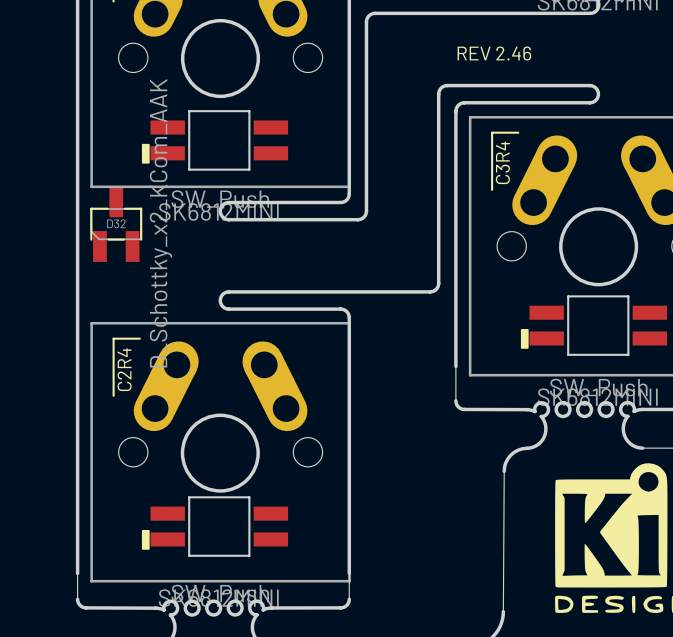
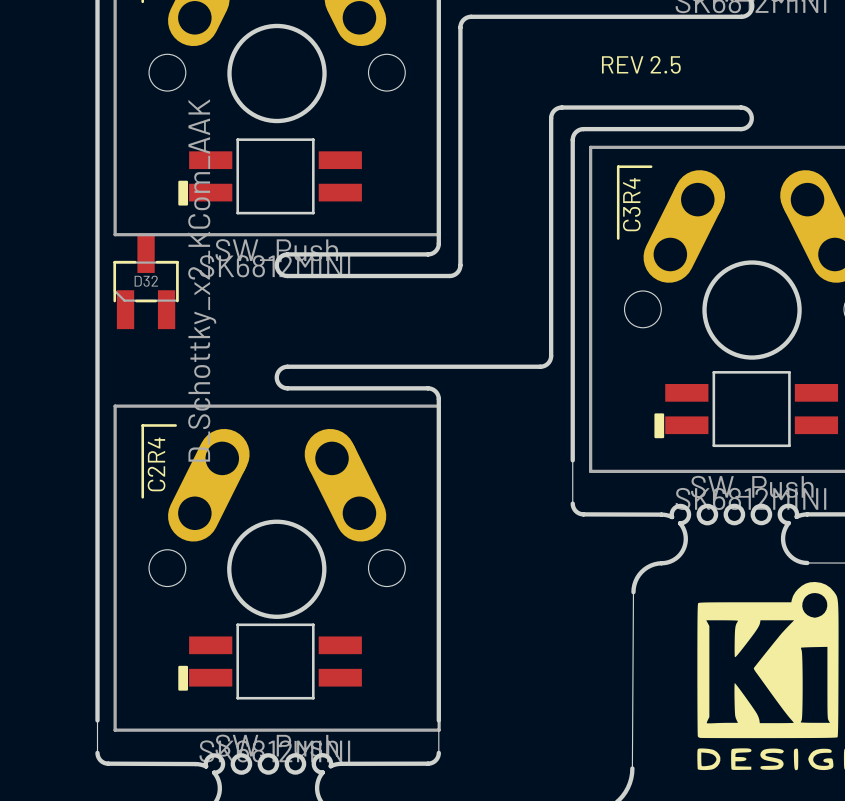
text: REV 2.46 (494, 53) -> REV 2.5 (641, 64)

